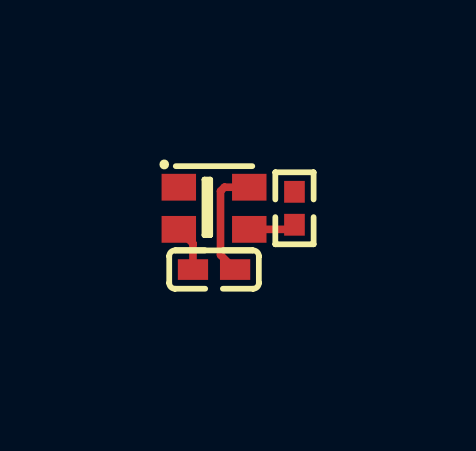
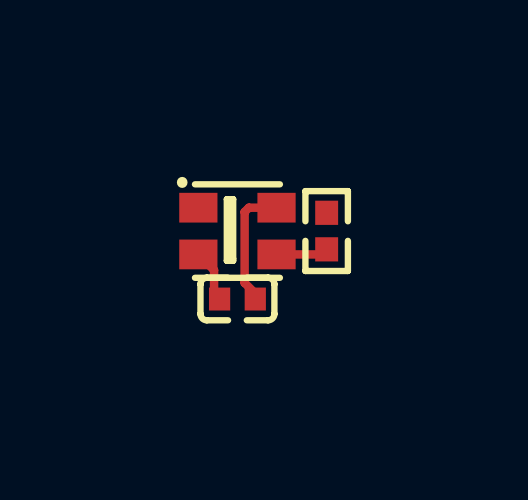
part footprint: [166, 247, 262, 292] -> [197, 274, 278, 324]

